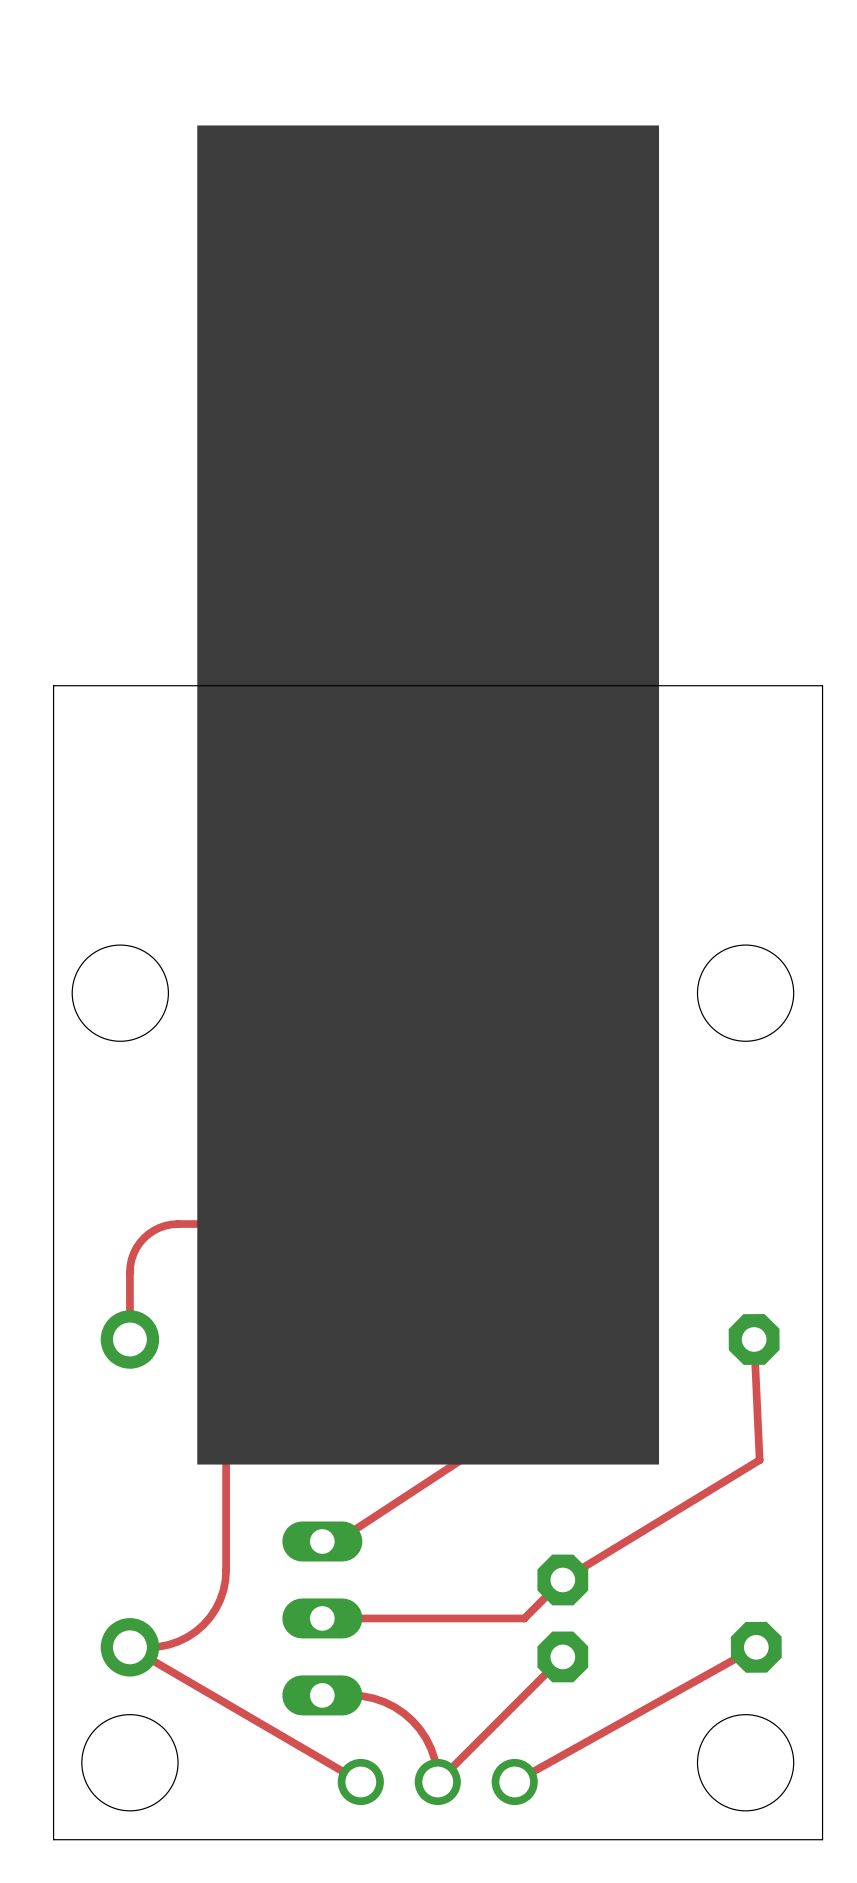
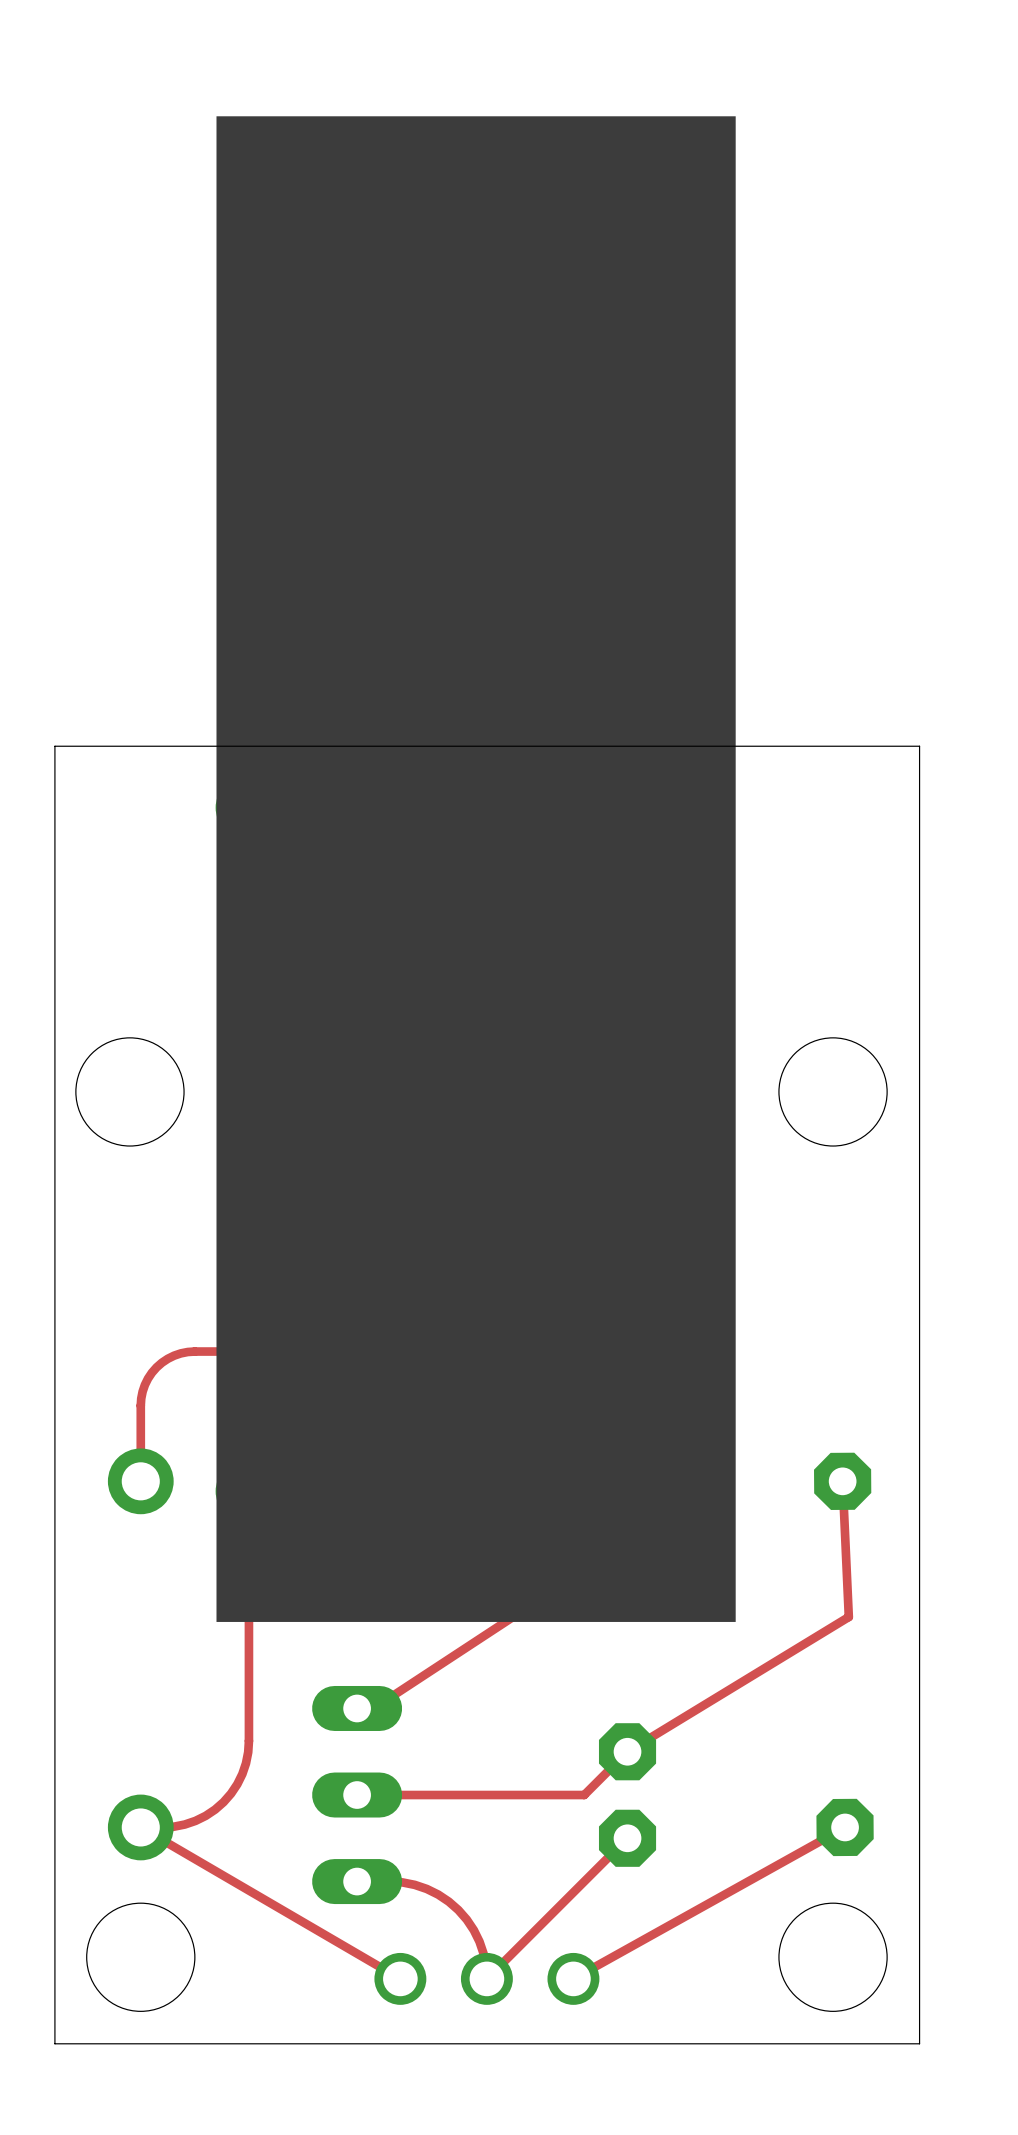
part footprint: [197, 125, 660, 1465] -> [215, 116, 736, 1622]

